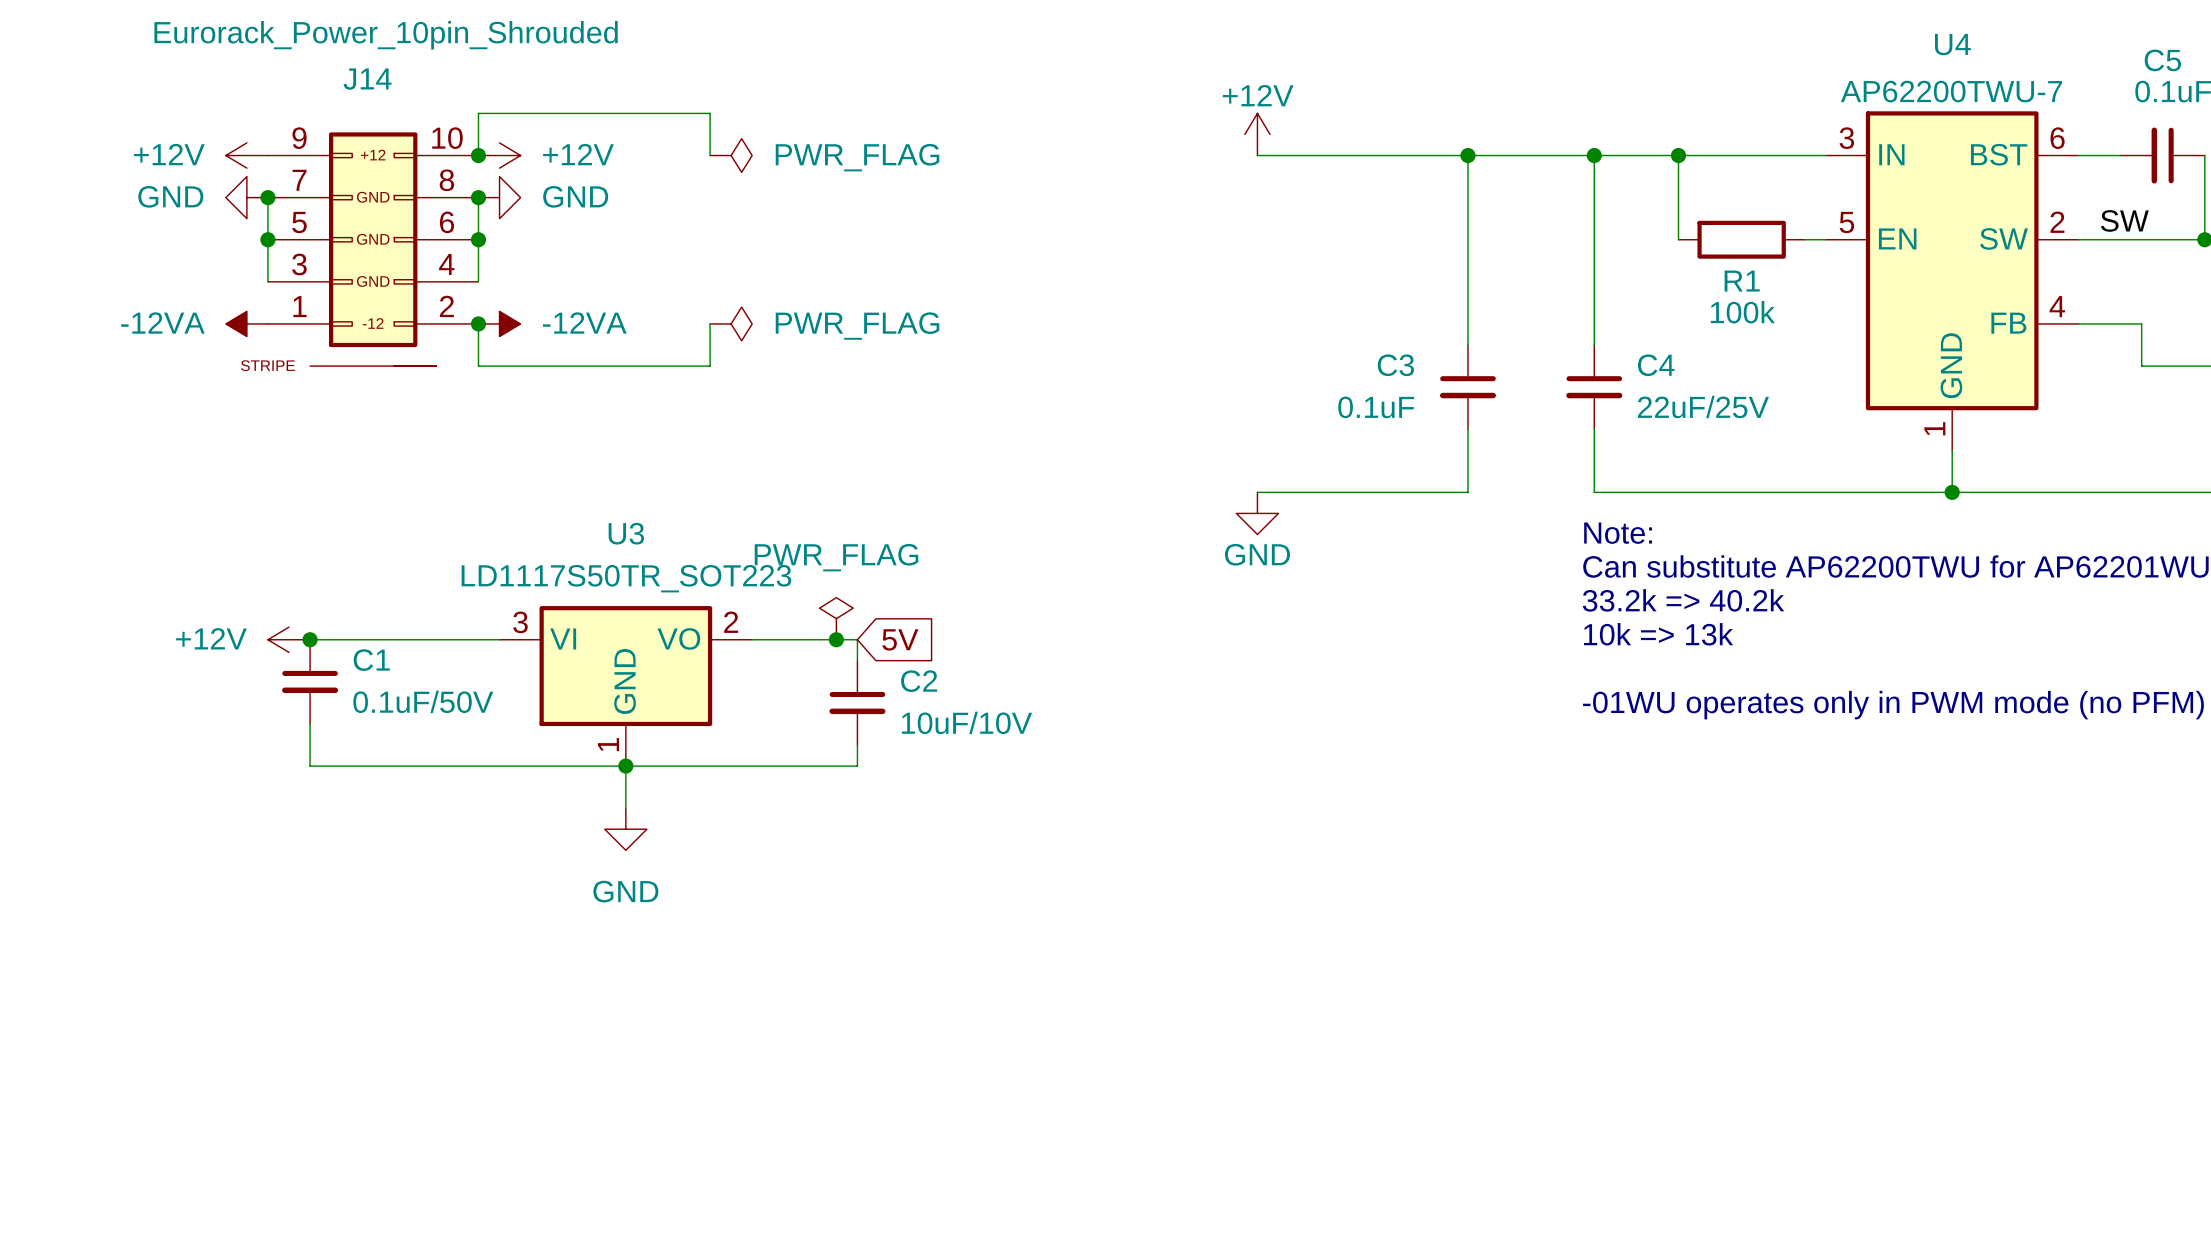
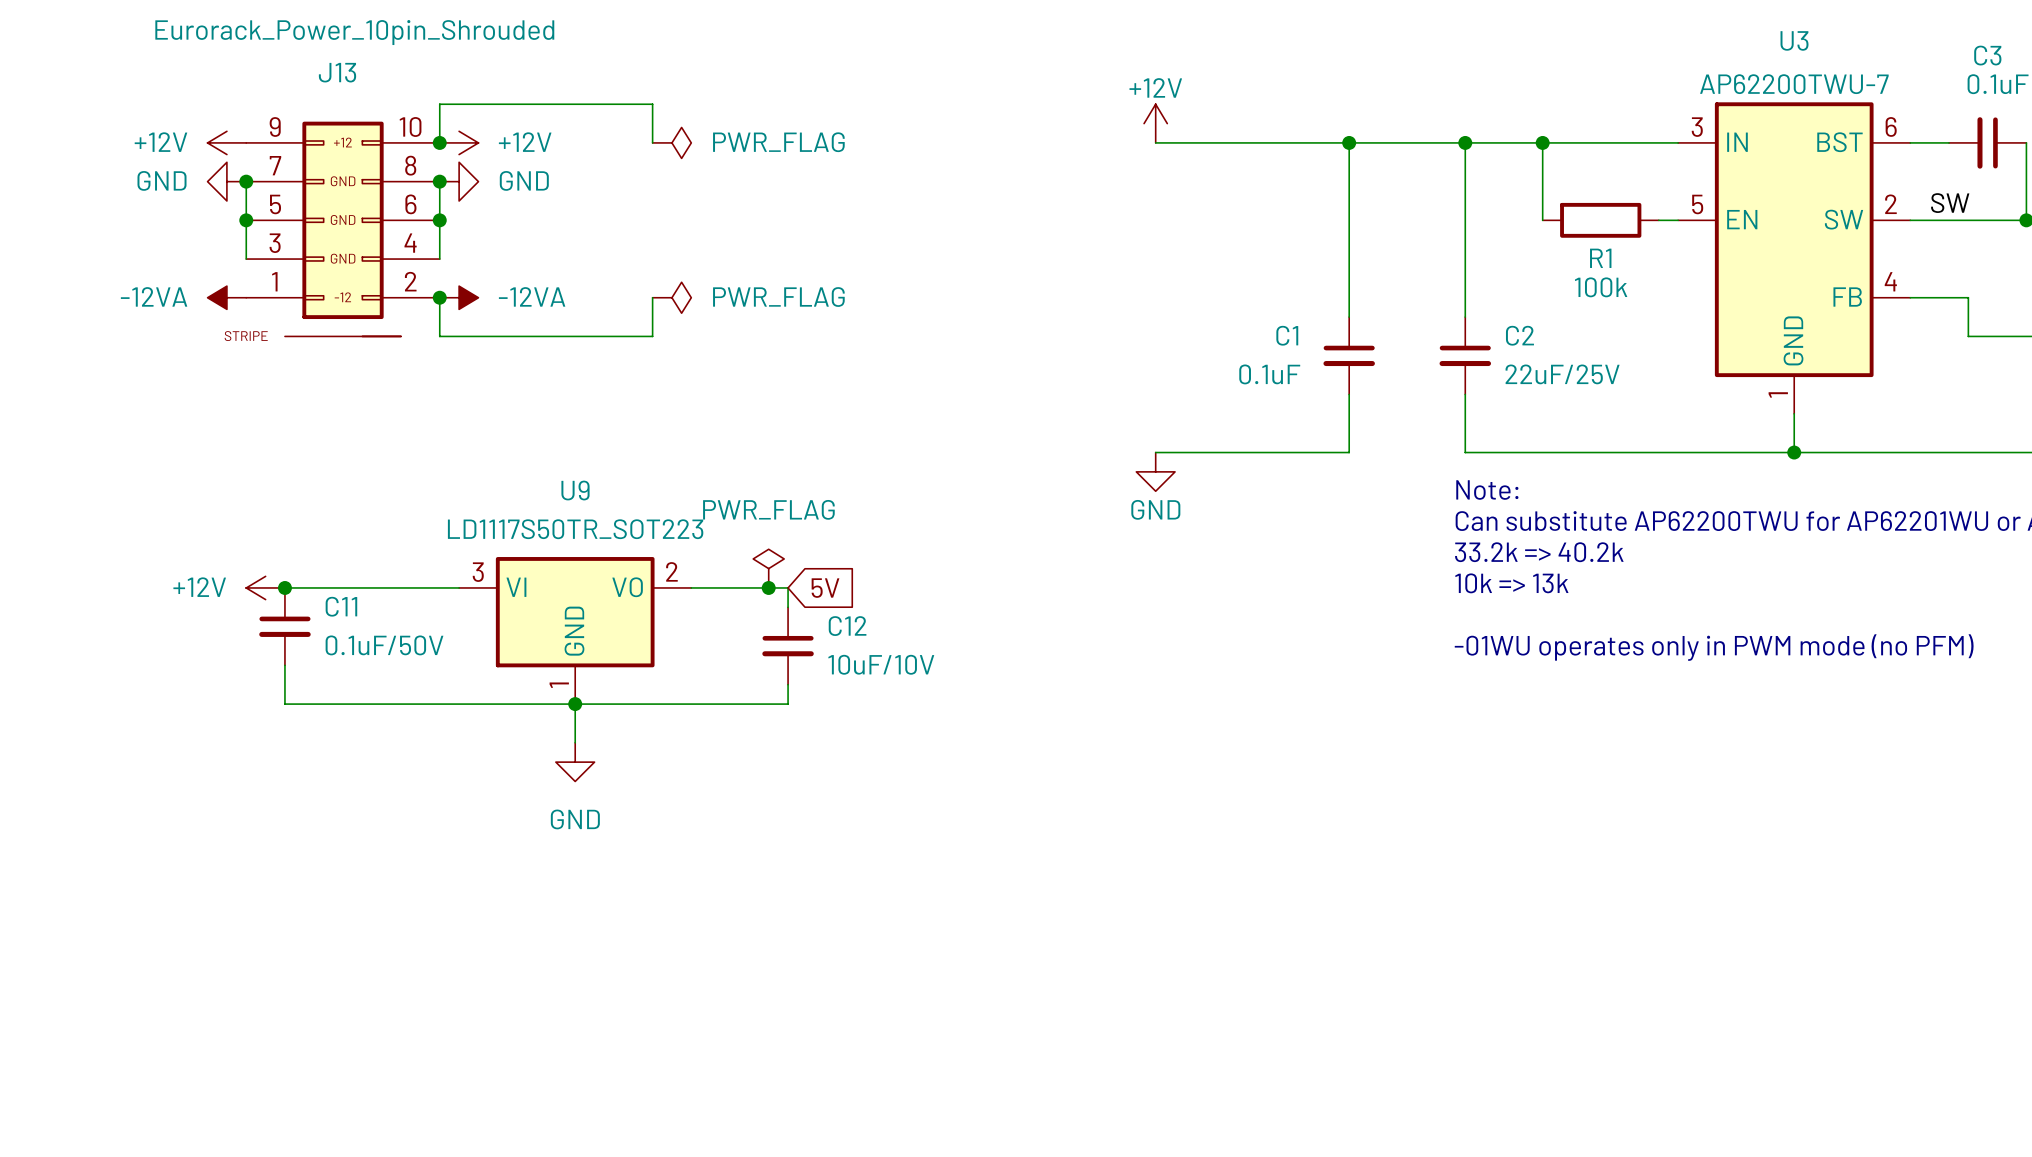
U4 name: U4 (1952, 44) -> U3 (1794, 40)
C5 name: C5 (2162, 60) -> C3 (1987, 55)
J14 name: J14 (367, 79) -> J13 (337, 72)
C3 name: C3 (1395, 365) -> C1 (1287, 335)
C4 name: C4 (1656, 365) -> C2 (1519, 335)
U3 name: U3 (626, 533) -> U9 (575, 490)
C1 name: C1 (371, 660) -> C11 (341, 606)
C2 name: C2 (919, 681) -> C12 (847, 626)

